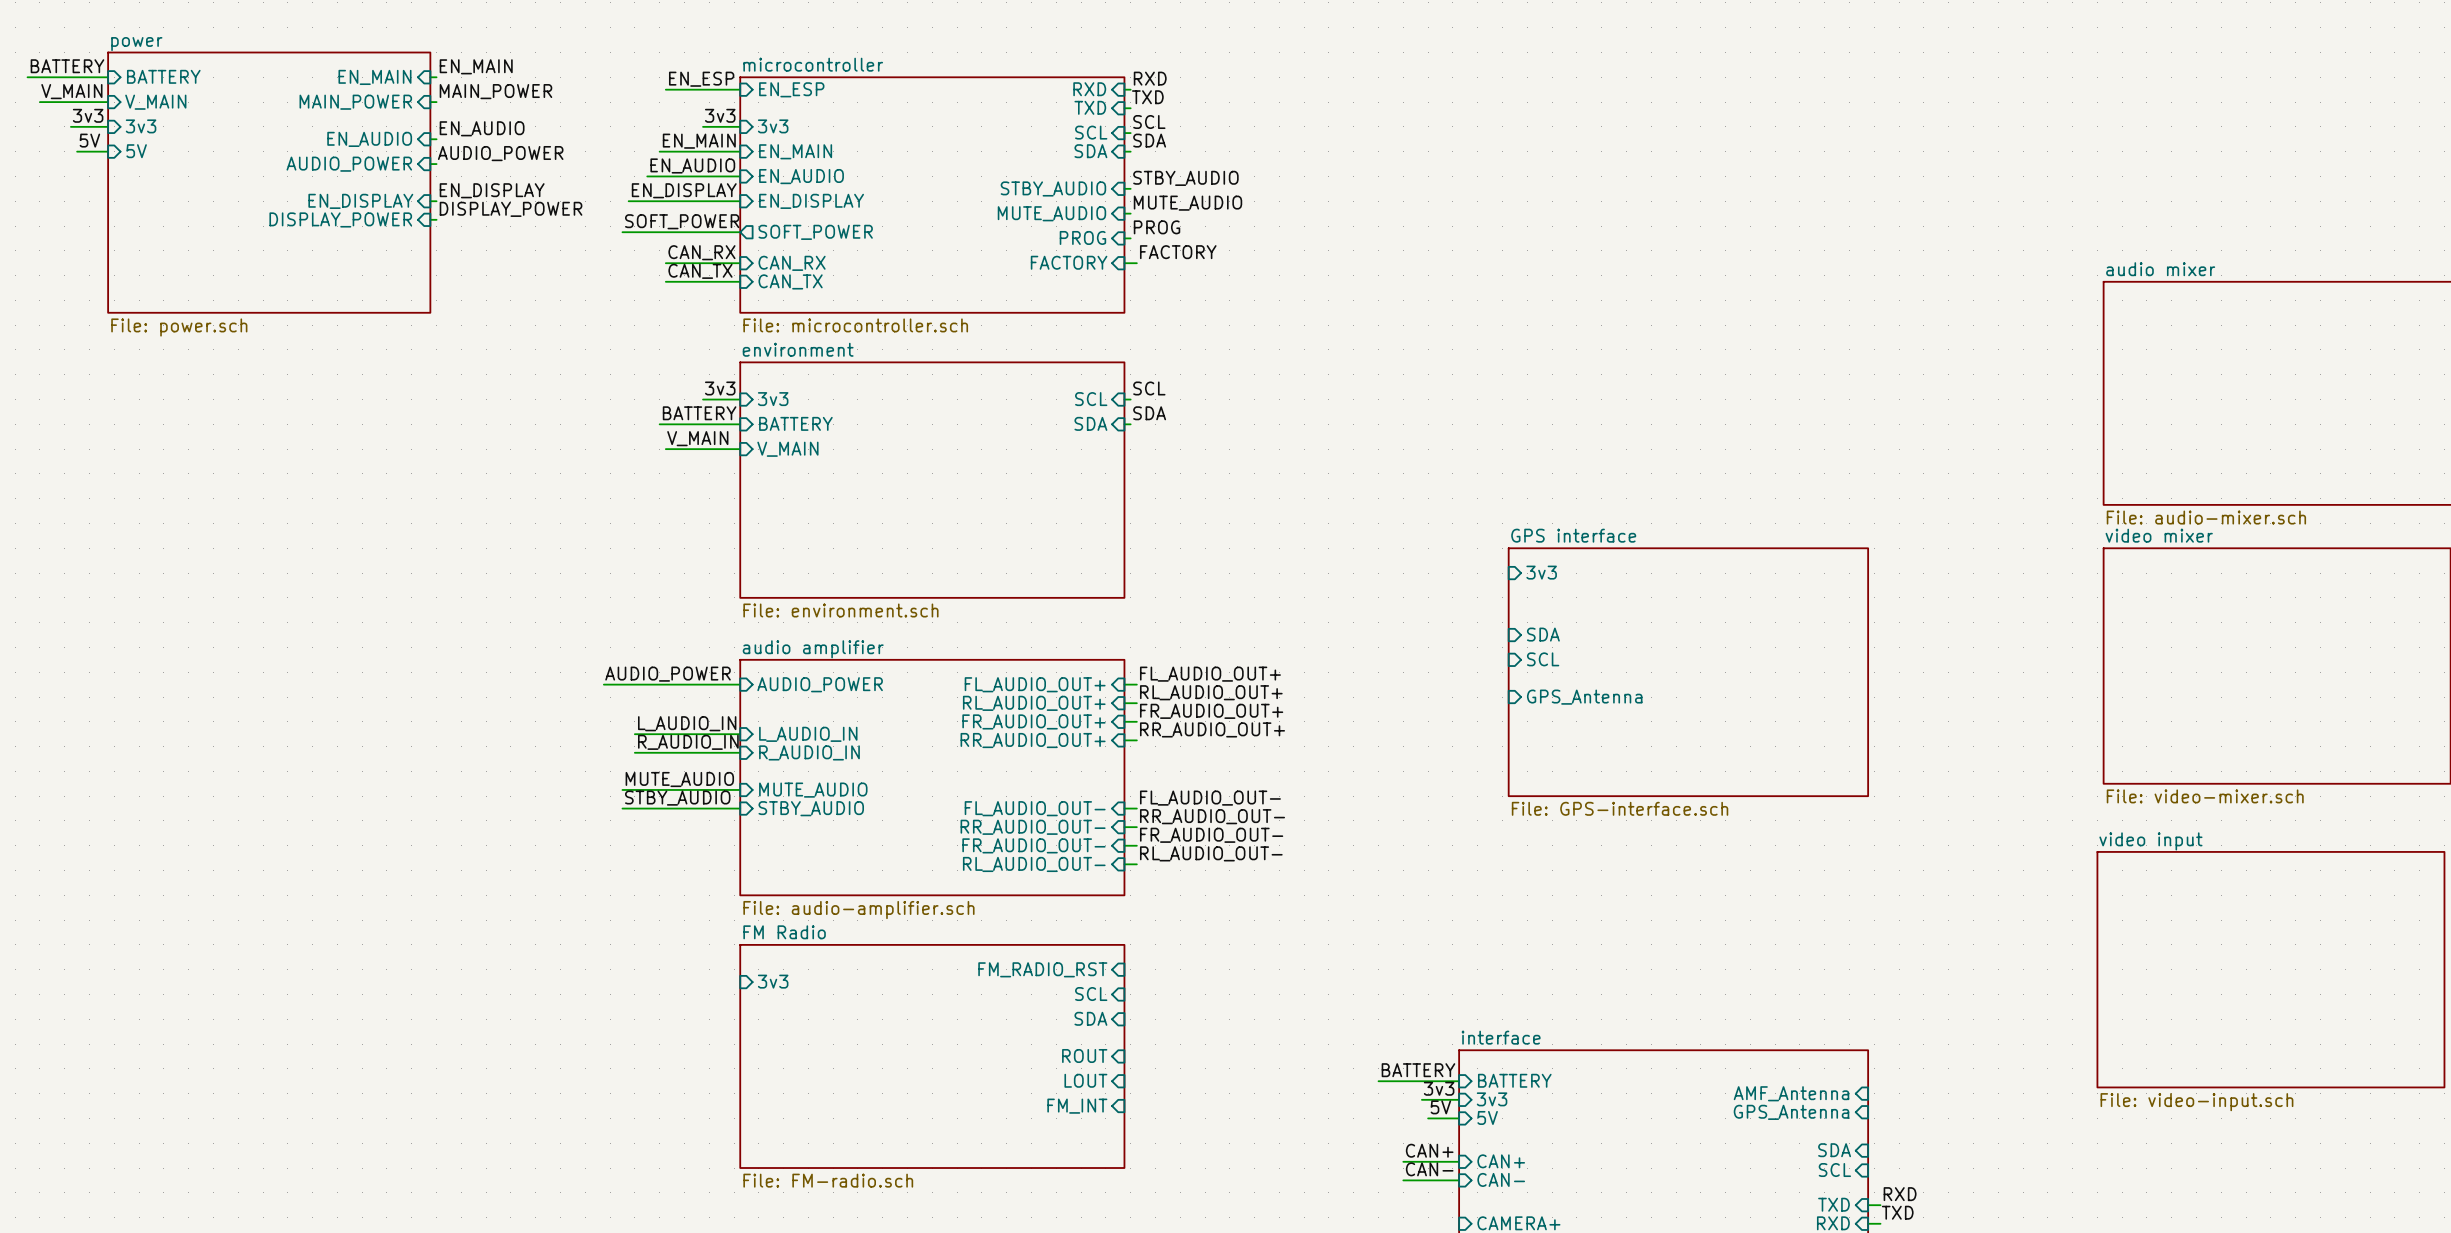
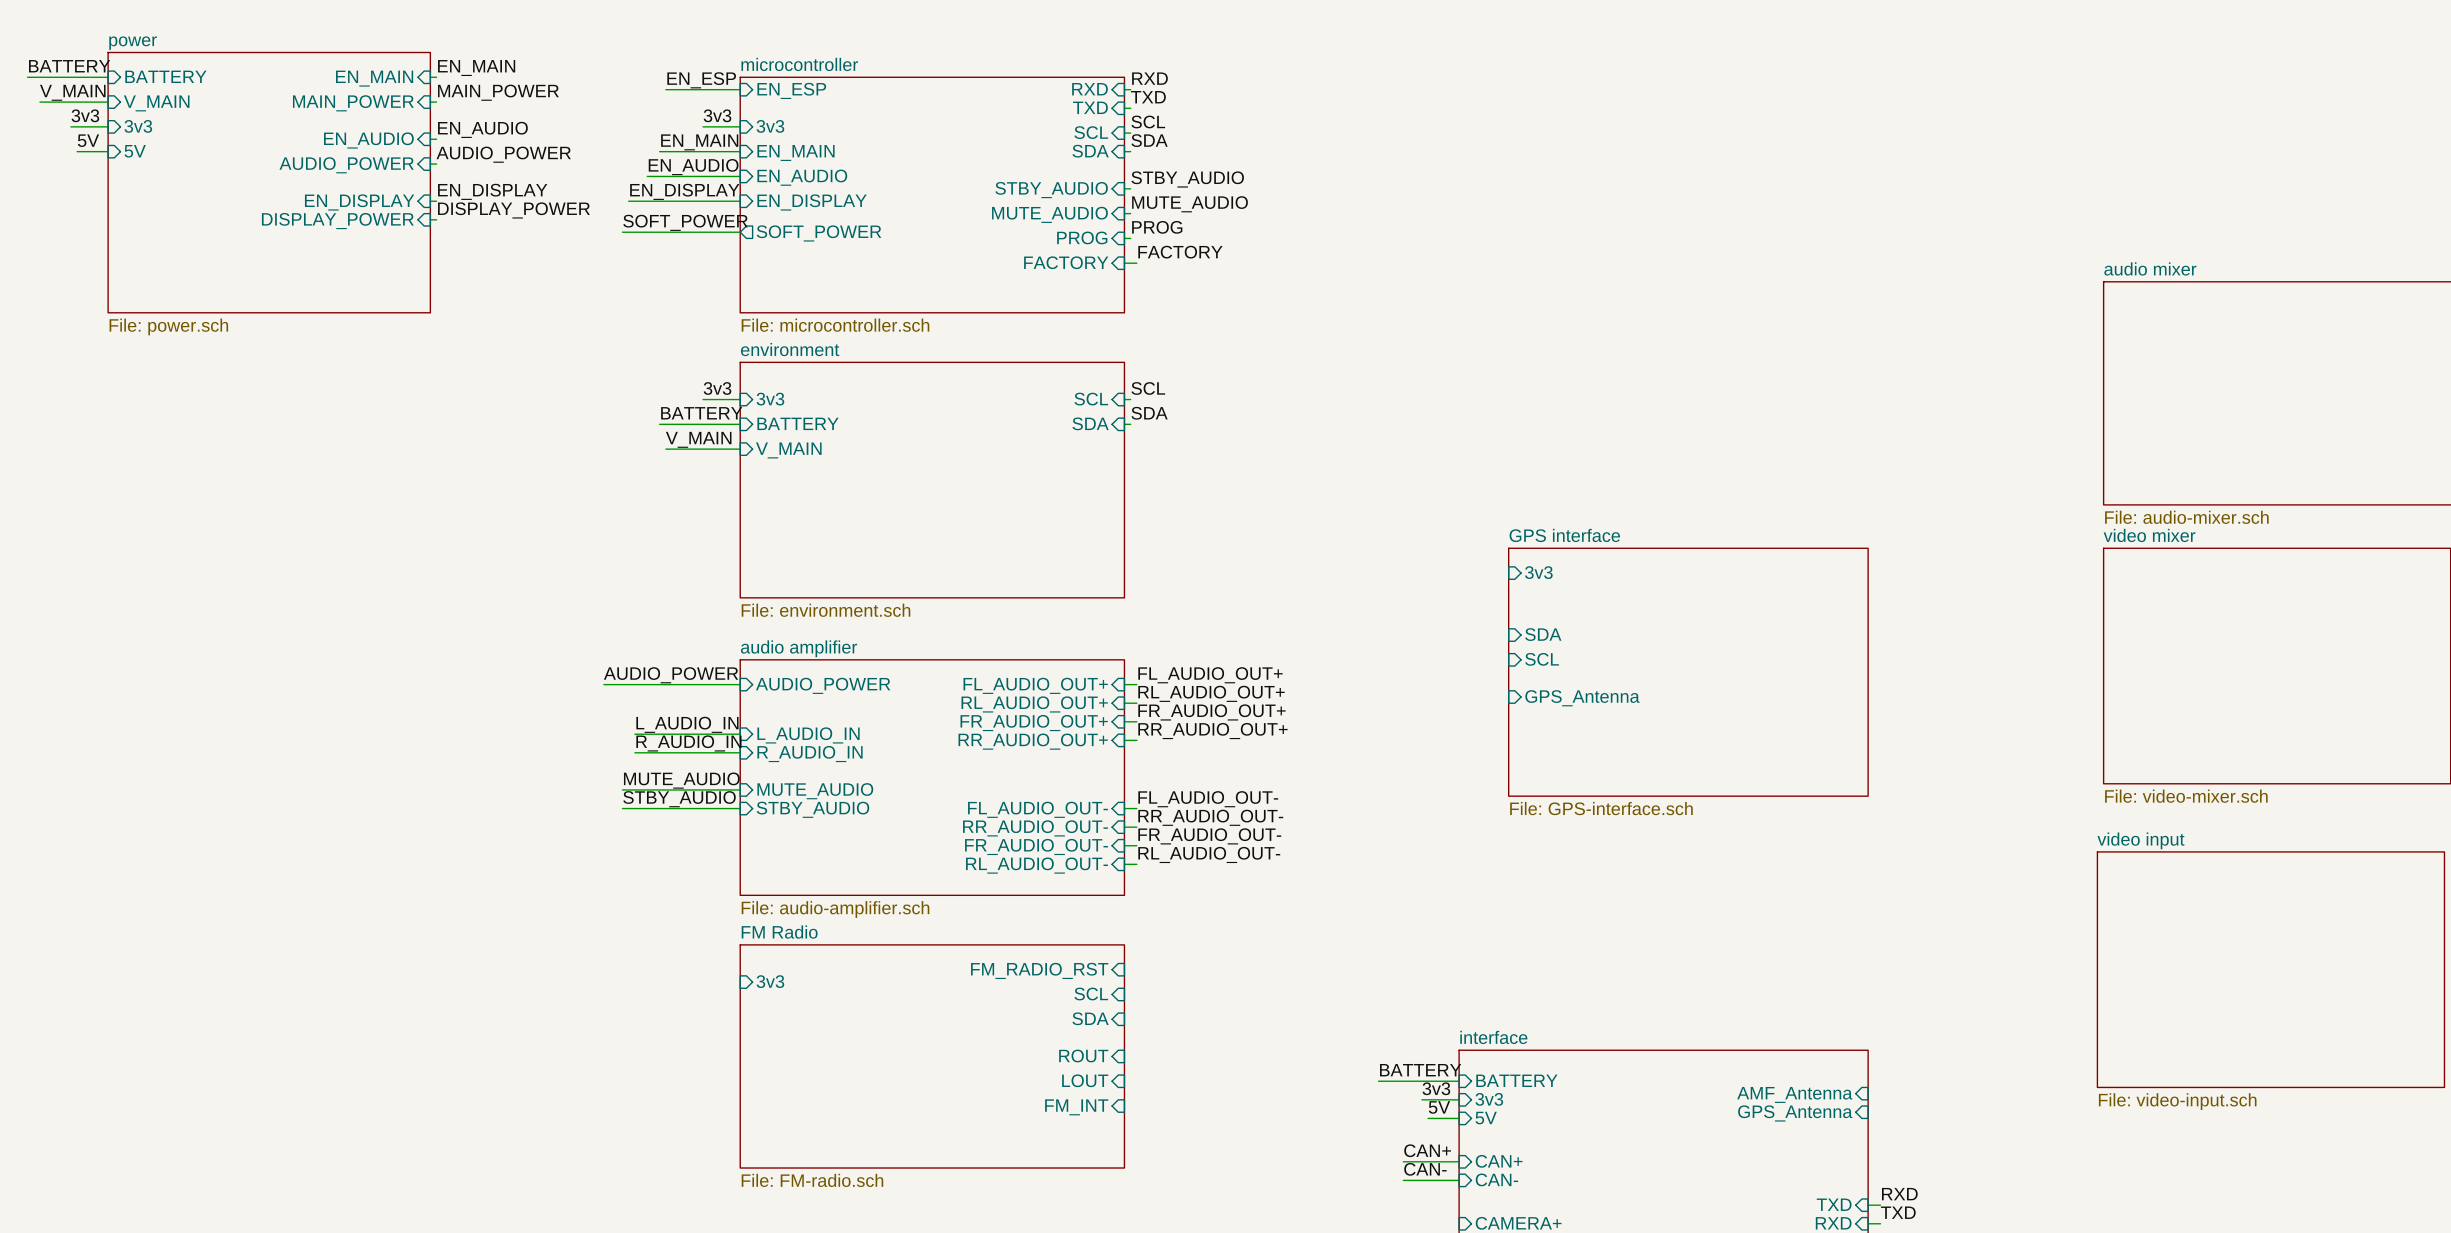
label: CAN_RX (701, 252) -> none
wire: (665, 263) (740, 263) -> none
sheet pin: CAN_RX (792, 263) -> none
label: CAN_TX (700, 271) -> none
wire: (665, 281) (740, 281) -> none
sheet pin: CAN_TX (790, 281) -> none
sheet pin: SDA (1834, 1150) -> none
sheet pin: SCL (1834, 1170) -> none

